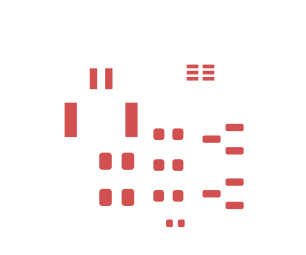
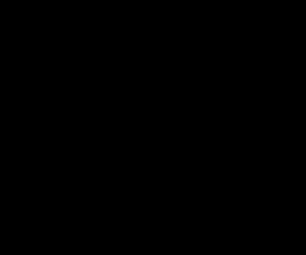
part: (200, 72) -> none
part: (101, 102) -> none
part: (168, 134) -> none
part: (223, 139) -> none
part: (116, 161) -> none
part: (168, 165) -> none
part: (223, 193) -> none
part: (168, 195) -> none
part: (116, 197) -> none
part: (175, 223) -> none

